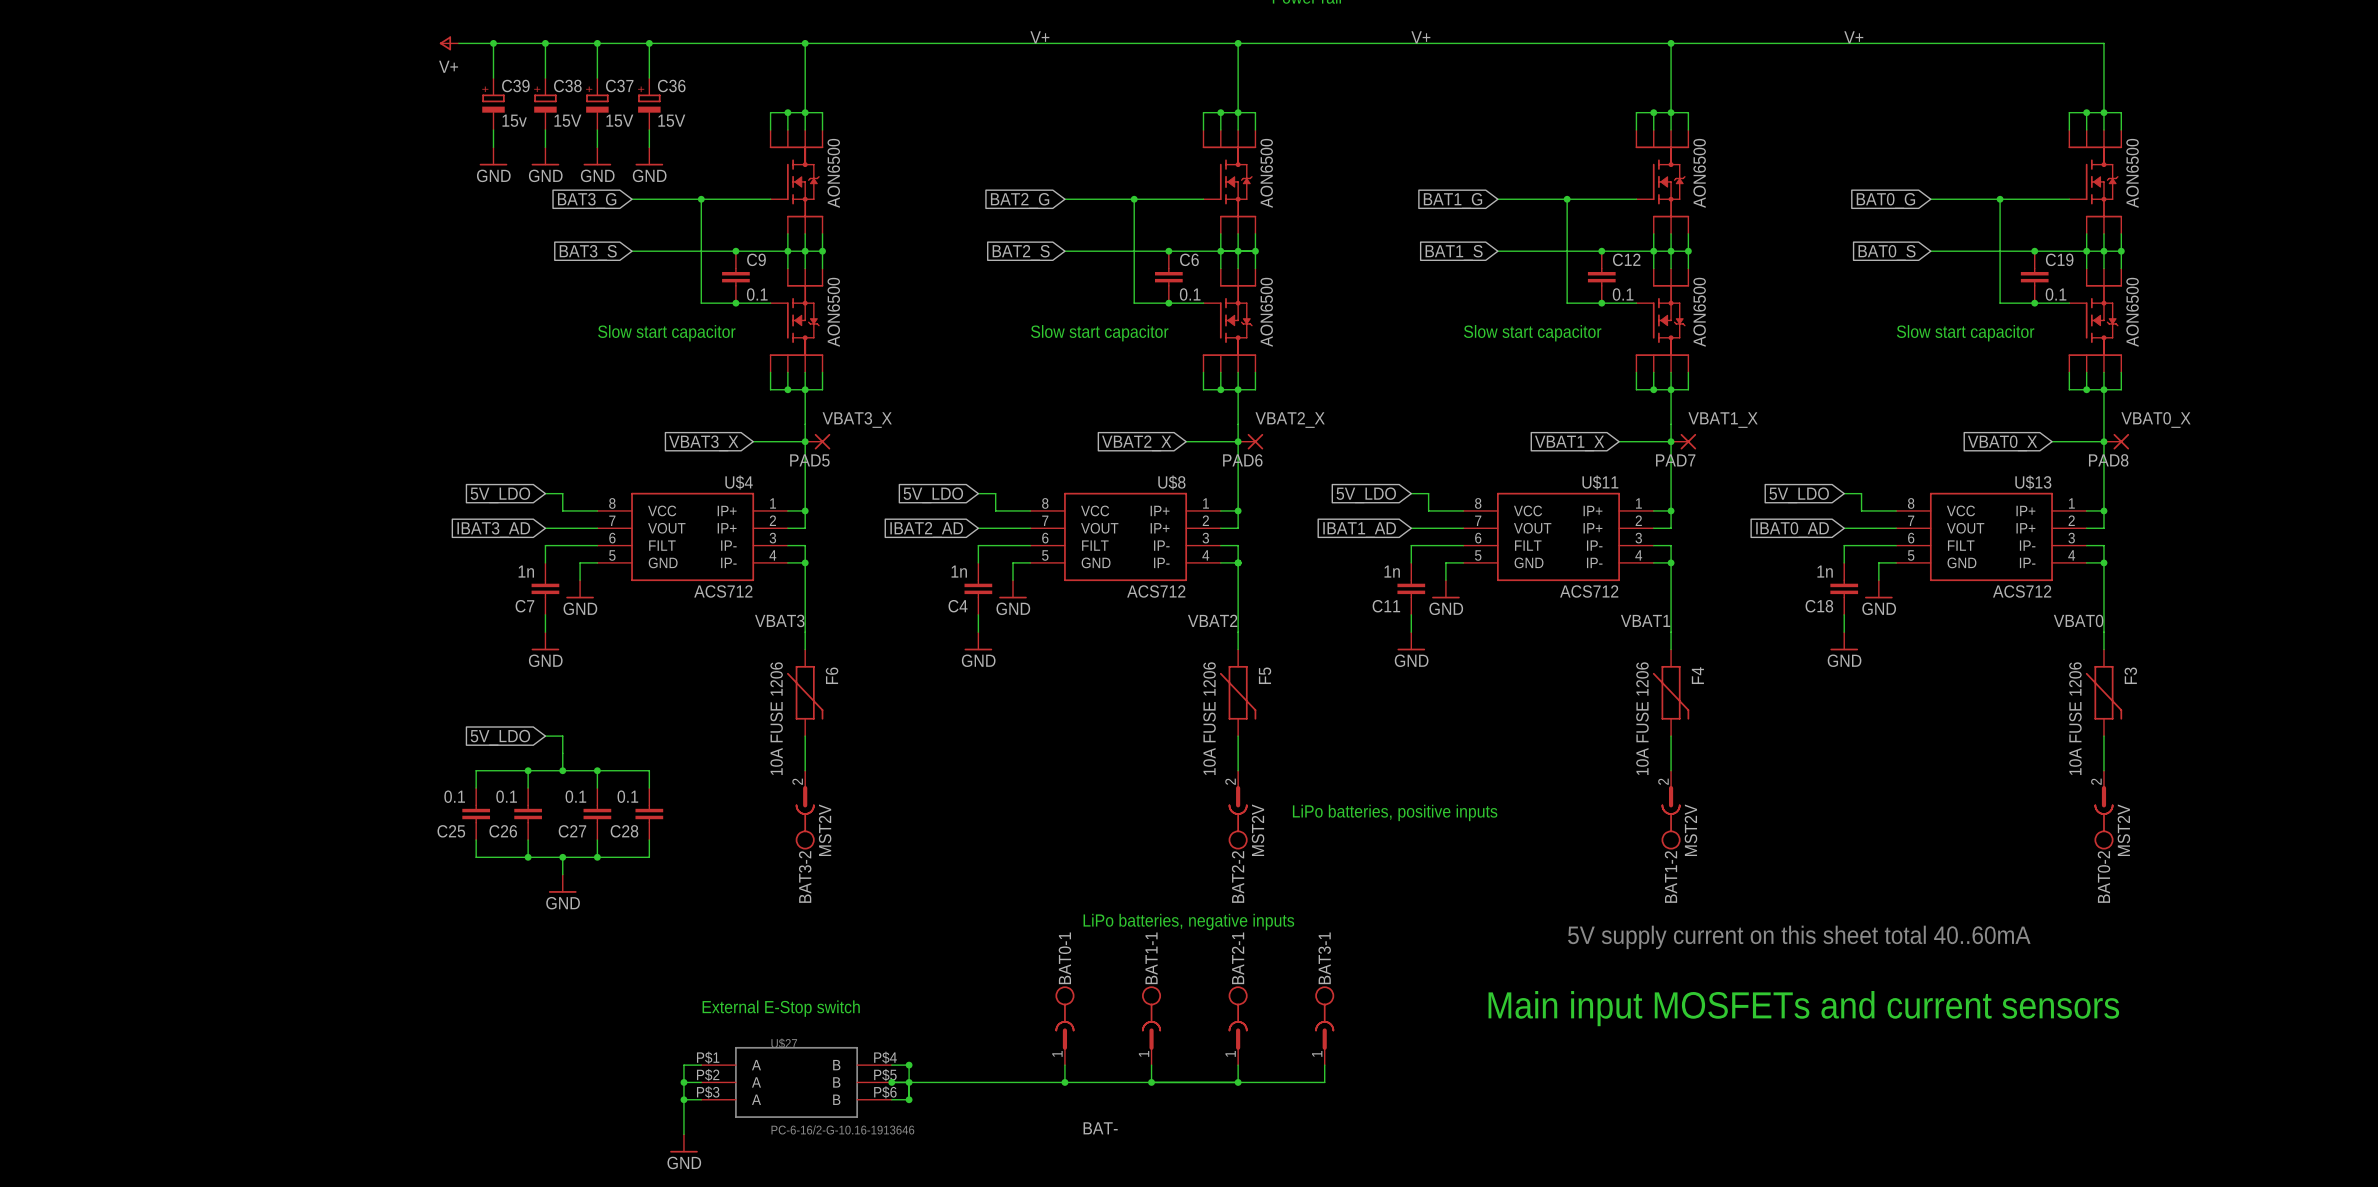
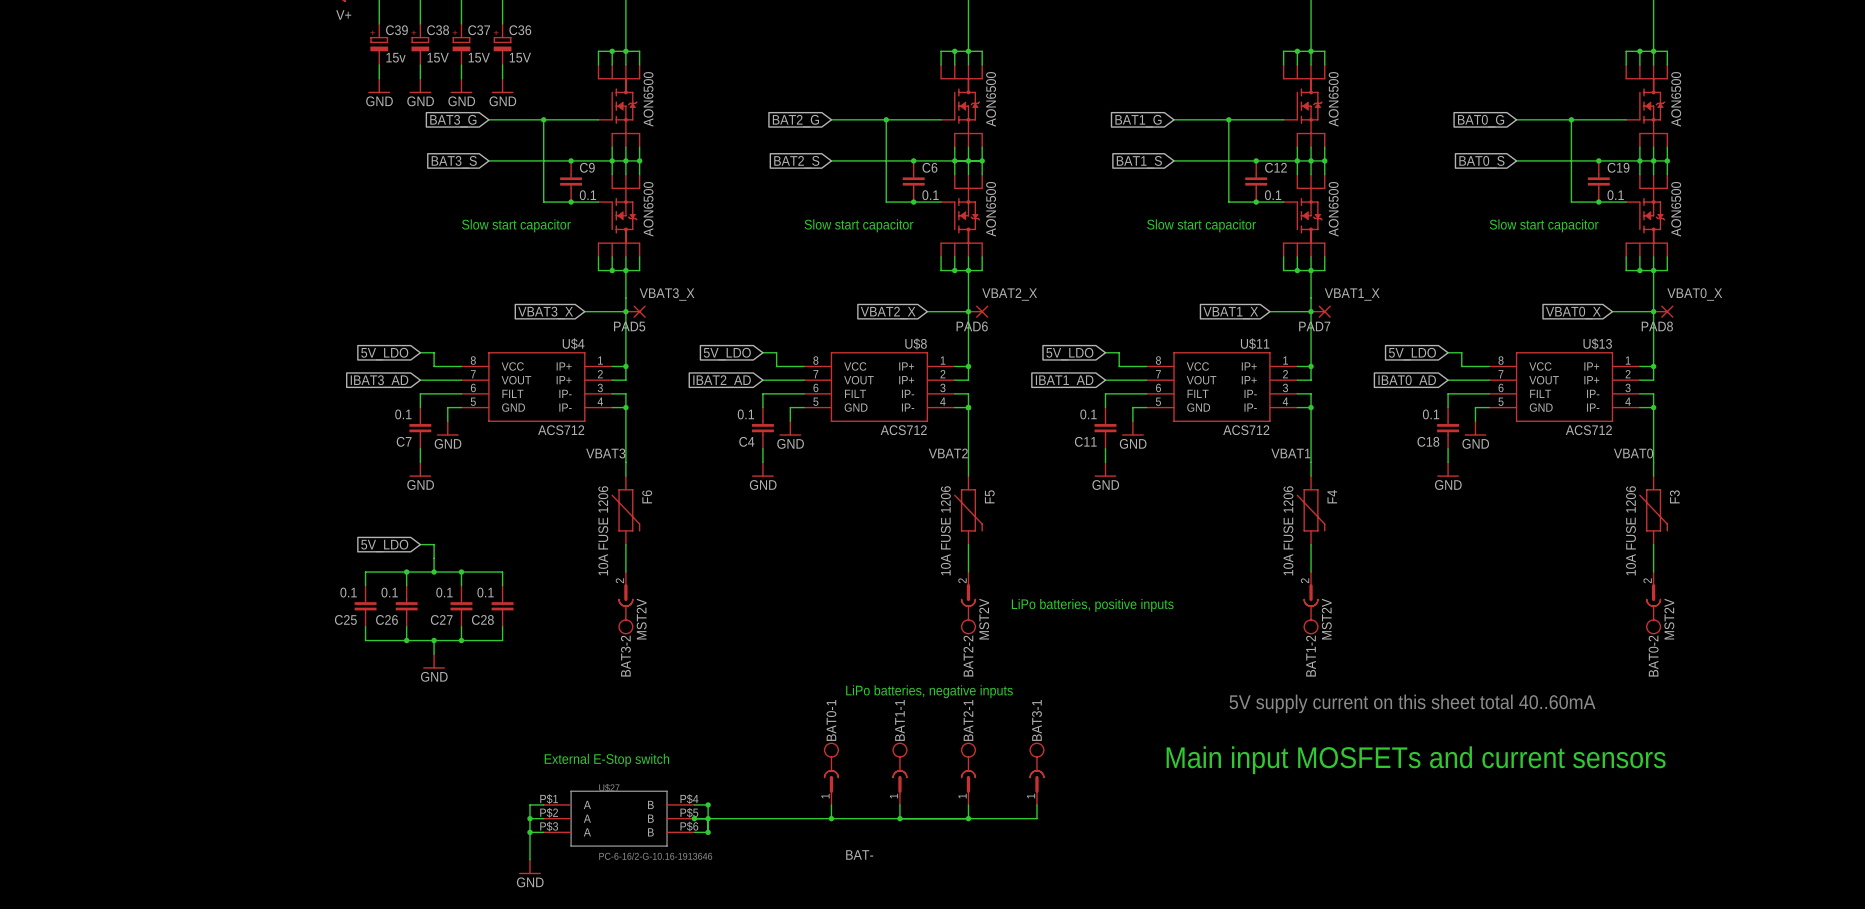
C7 value: 1n (526, 571) -> 0.1 (403, 414)
C4 value: 1n (959, 571) -> 0.1 (745, 414)
C11 value: 1n (1392, 571) -> 0.1 (1088, 414)
C18 value: 1n (1825, 571) -> 0.1 (1431, 414)

